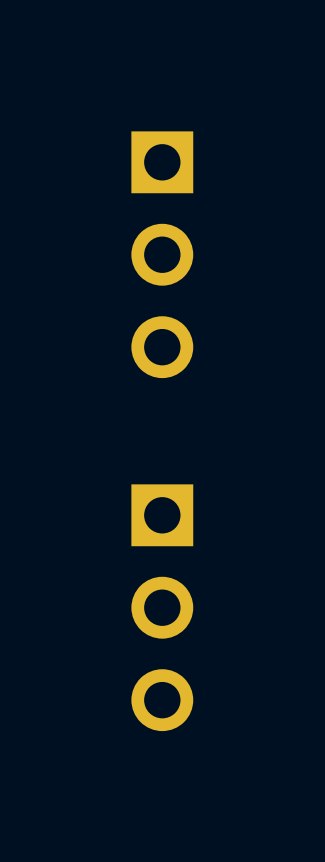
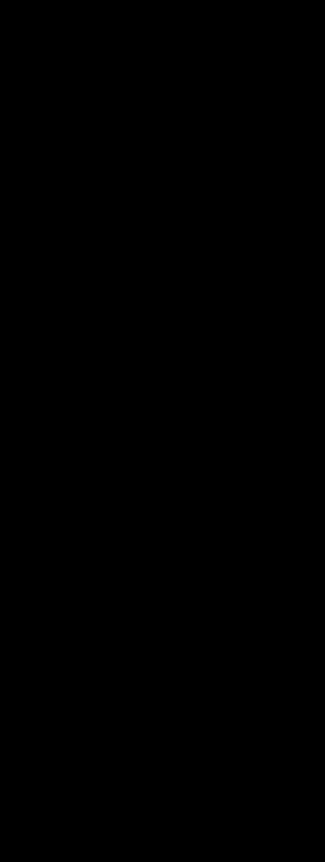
part: (162, 254) -> none
part: (162, 607) -> none

